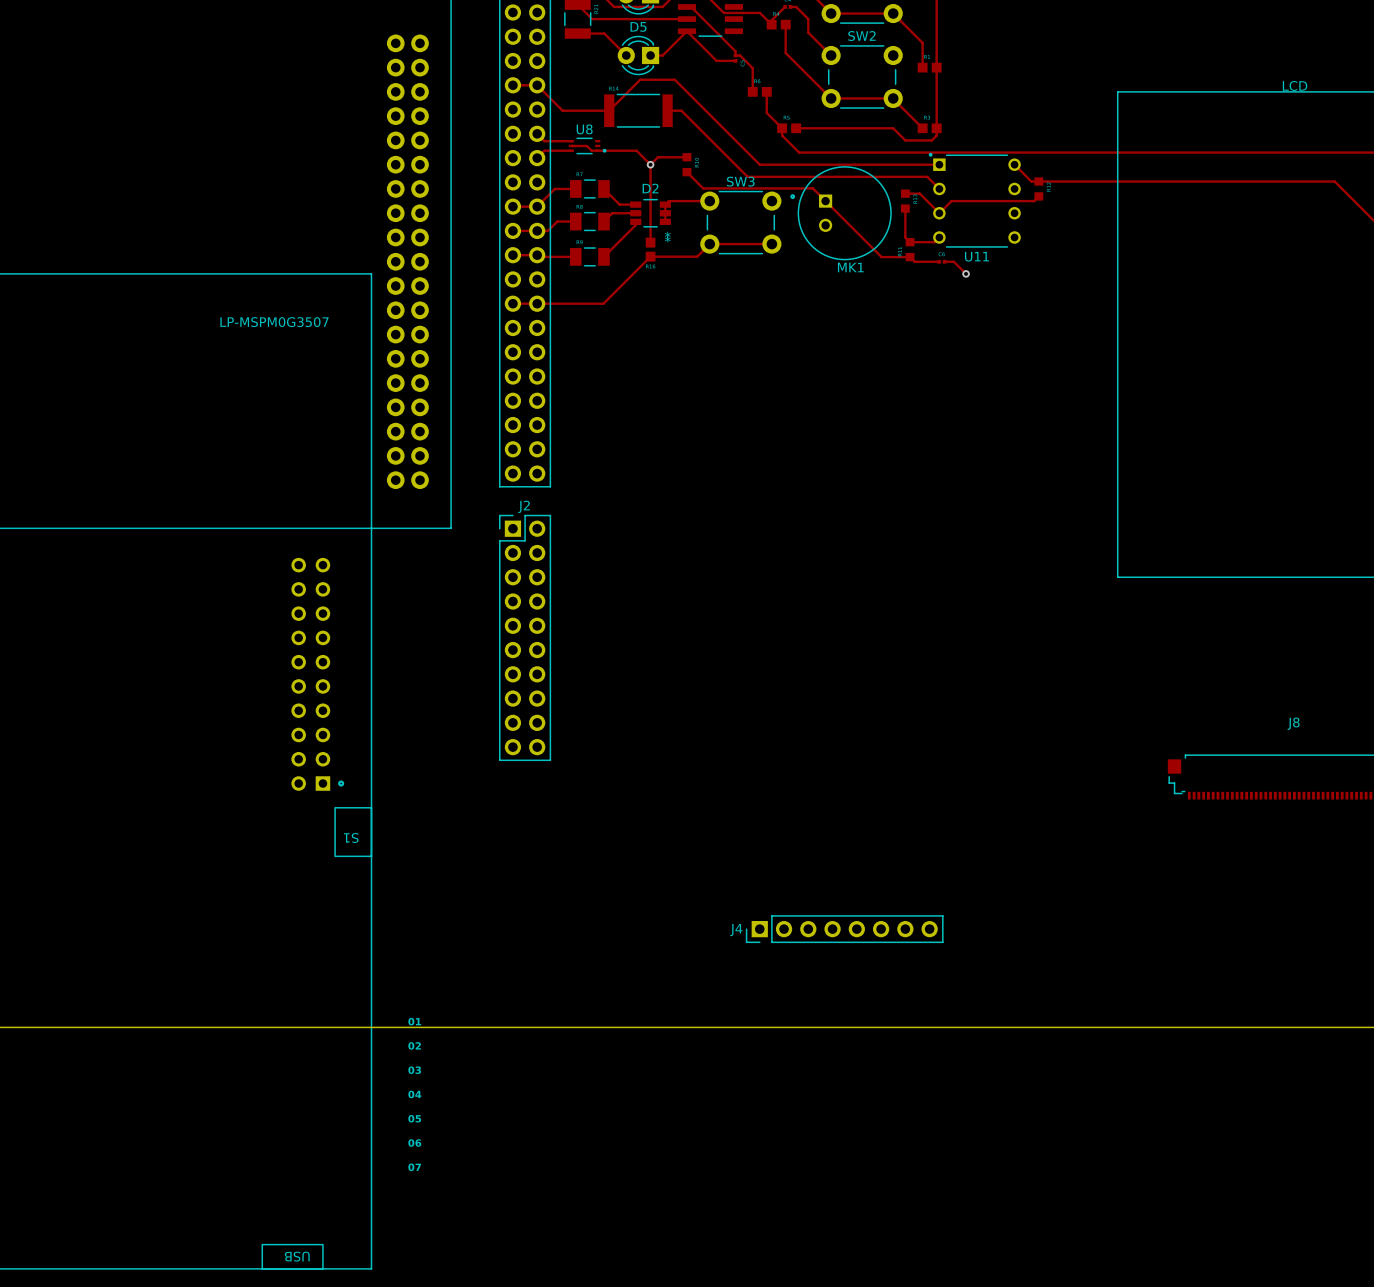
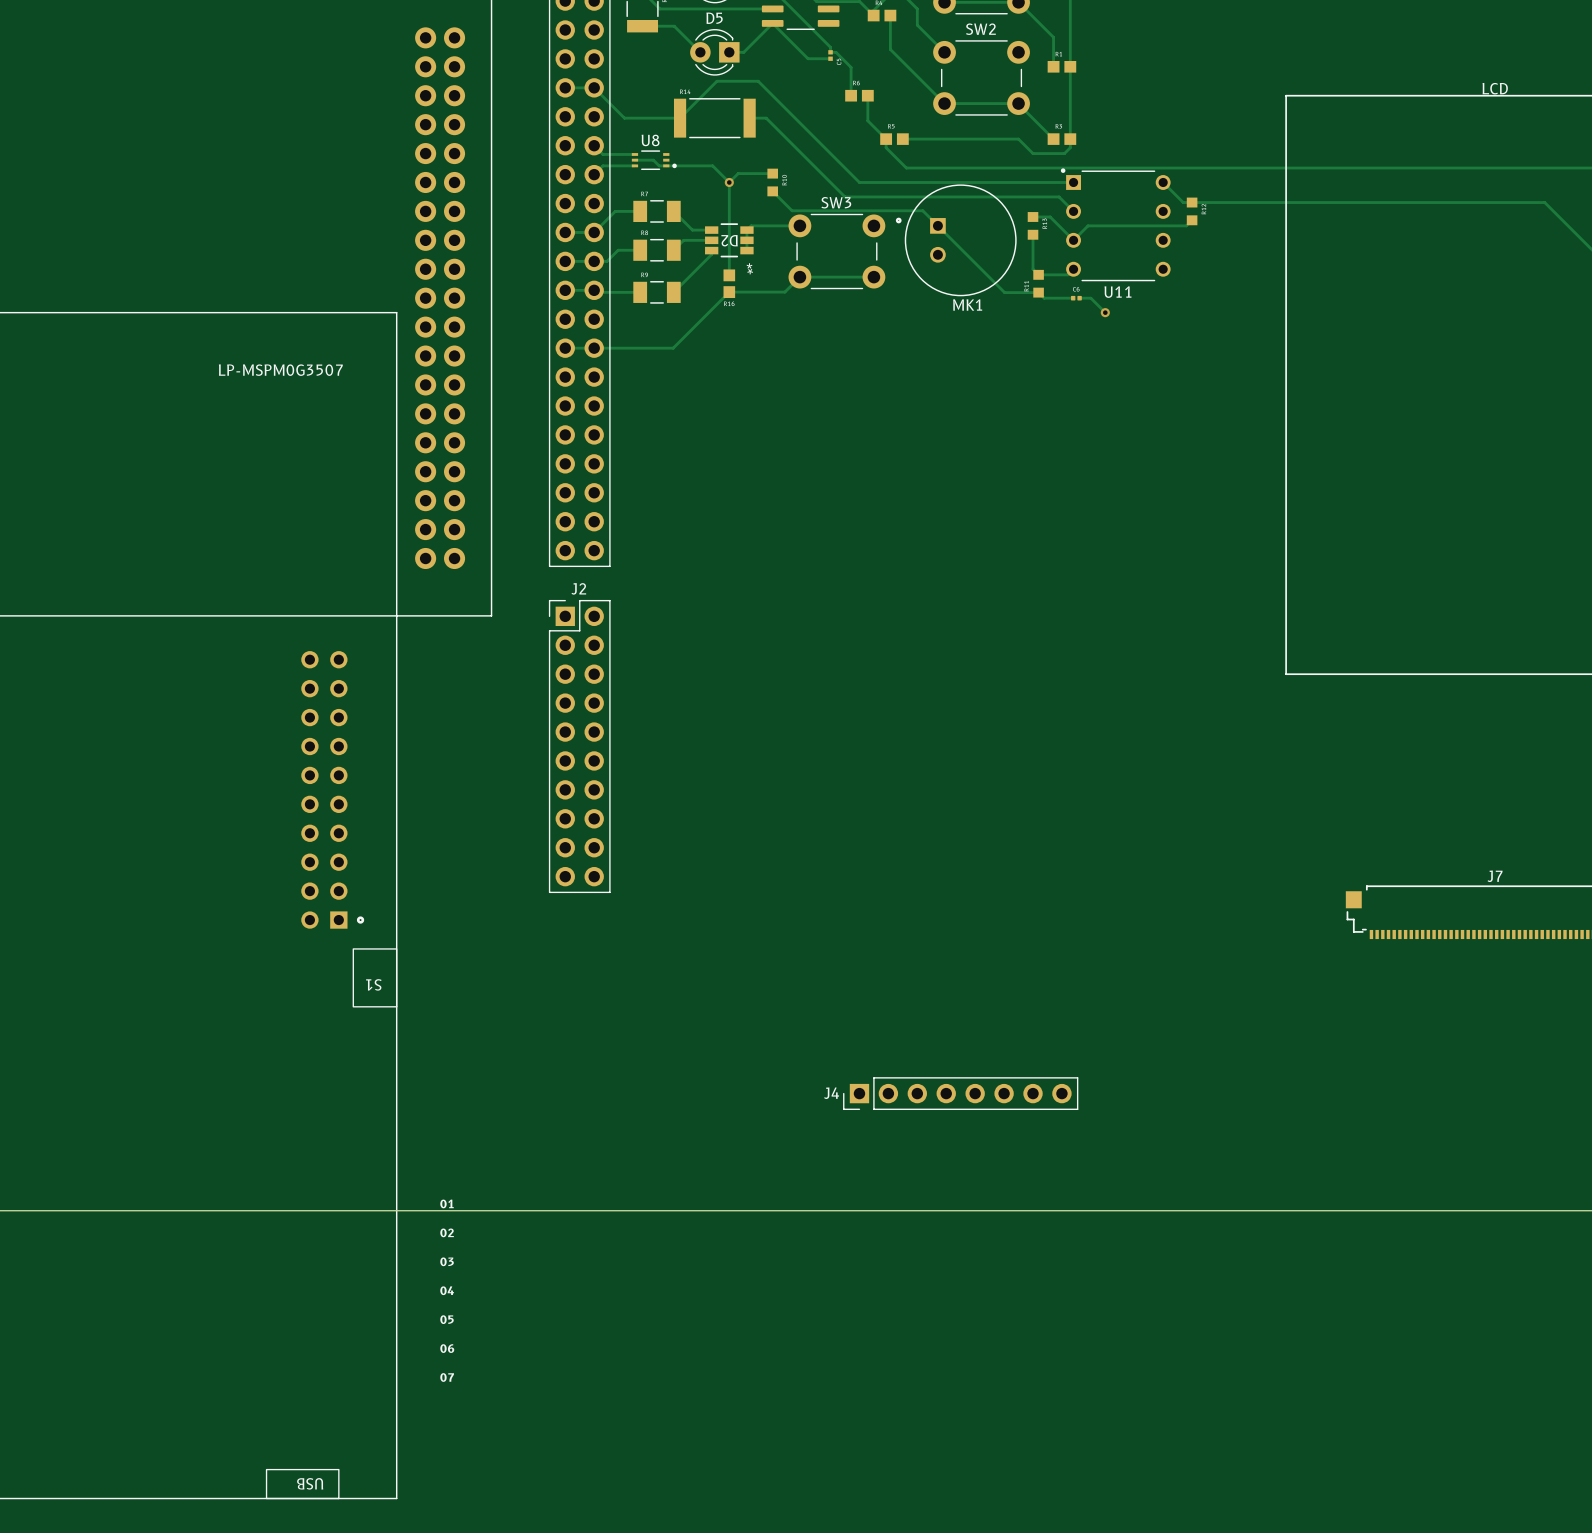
D2 name rotation: 0° (650, 188) -> 180° (729, 240)
D2 name position: D2 (650, 188) -> D2 (729, 240)
J8 name: J8 (1293, 723) -> J7 (1495, 876)

